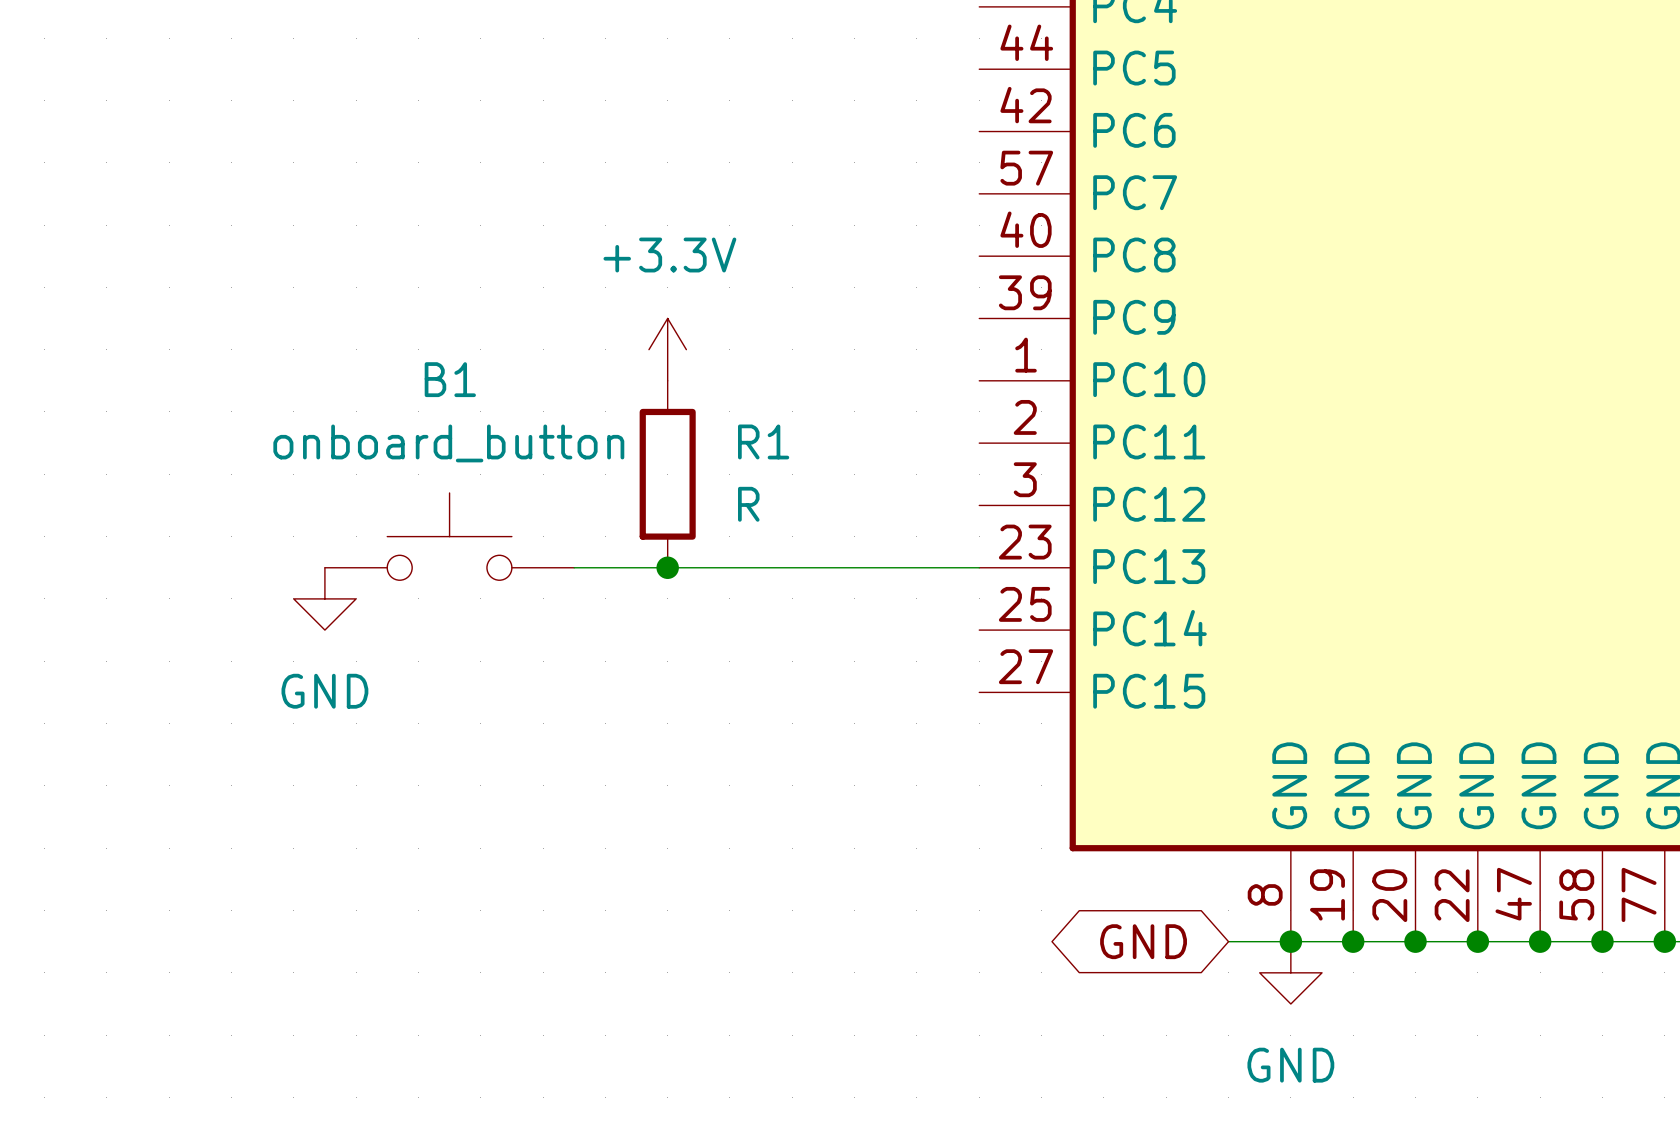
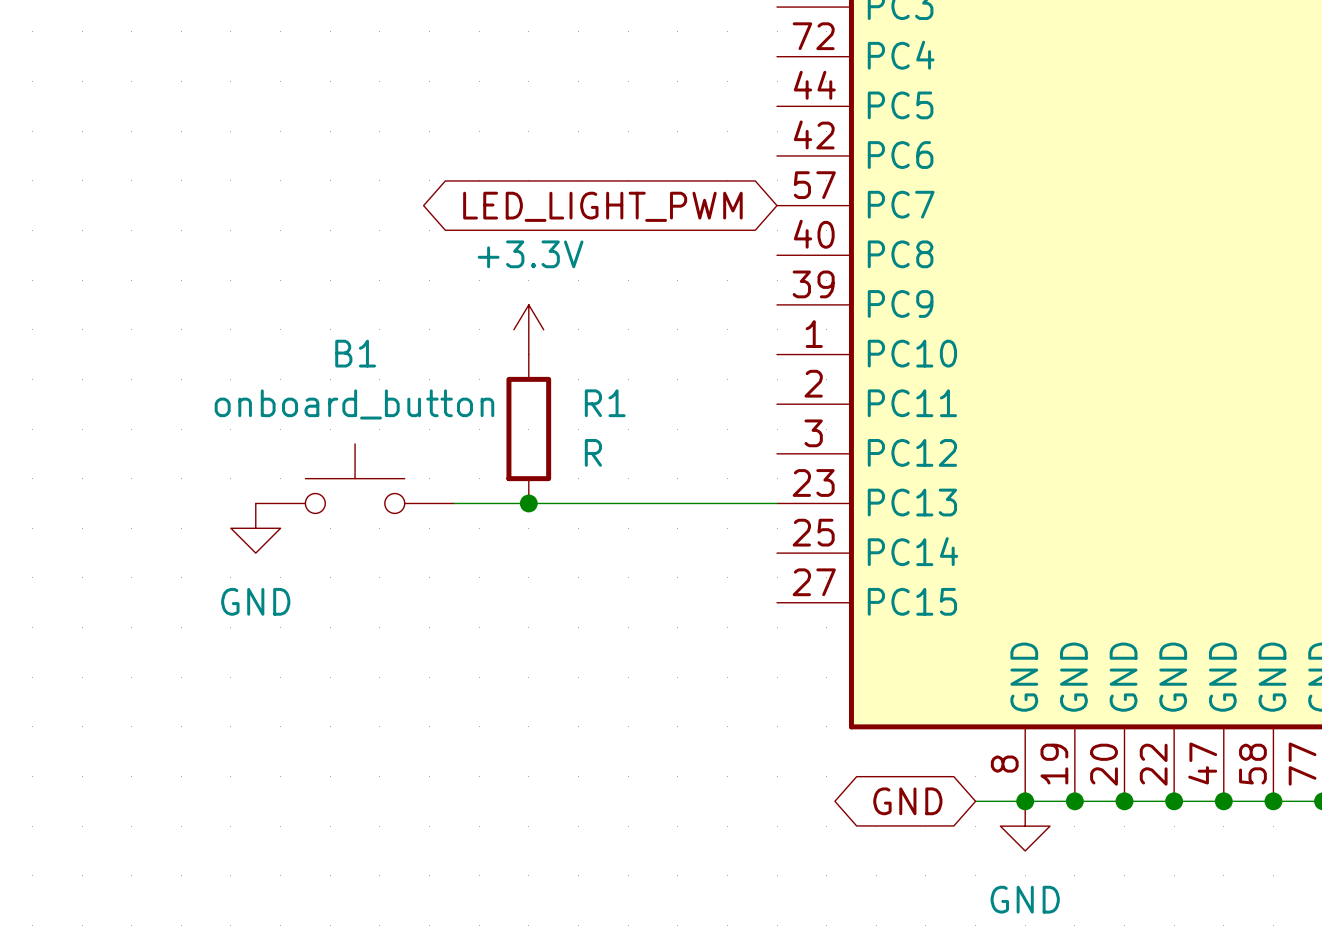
global label: none -> LED_LIGHT_PWM (602, 206)

